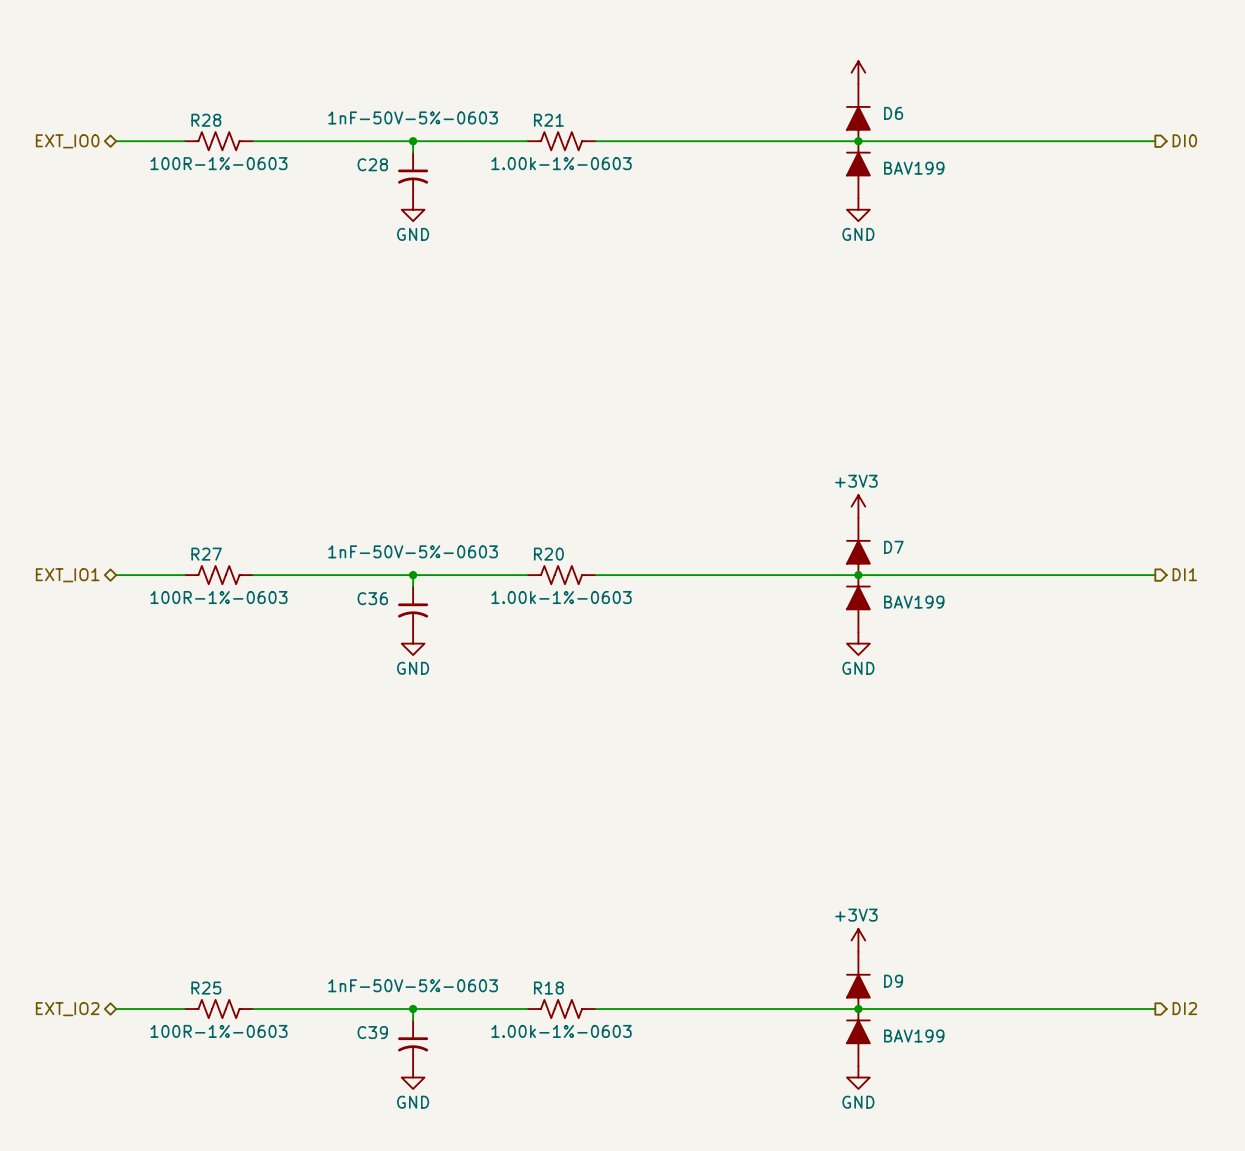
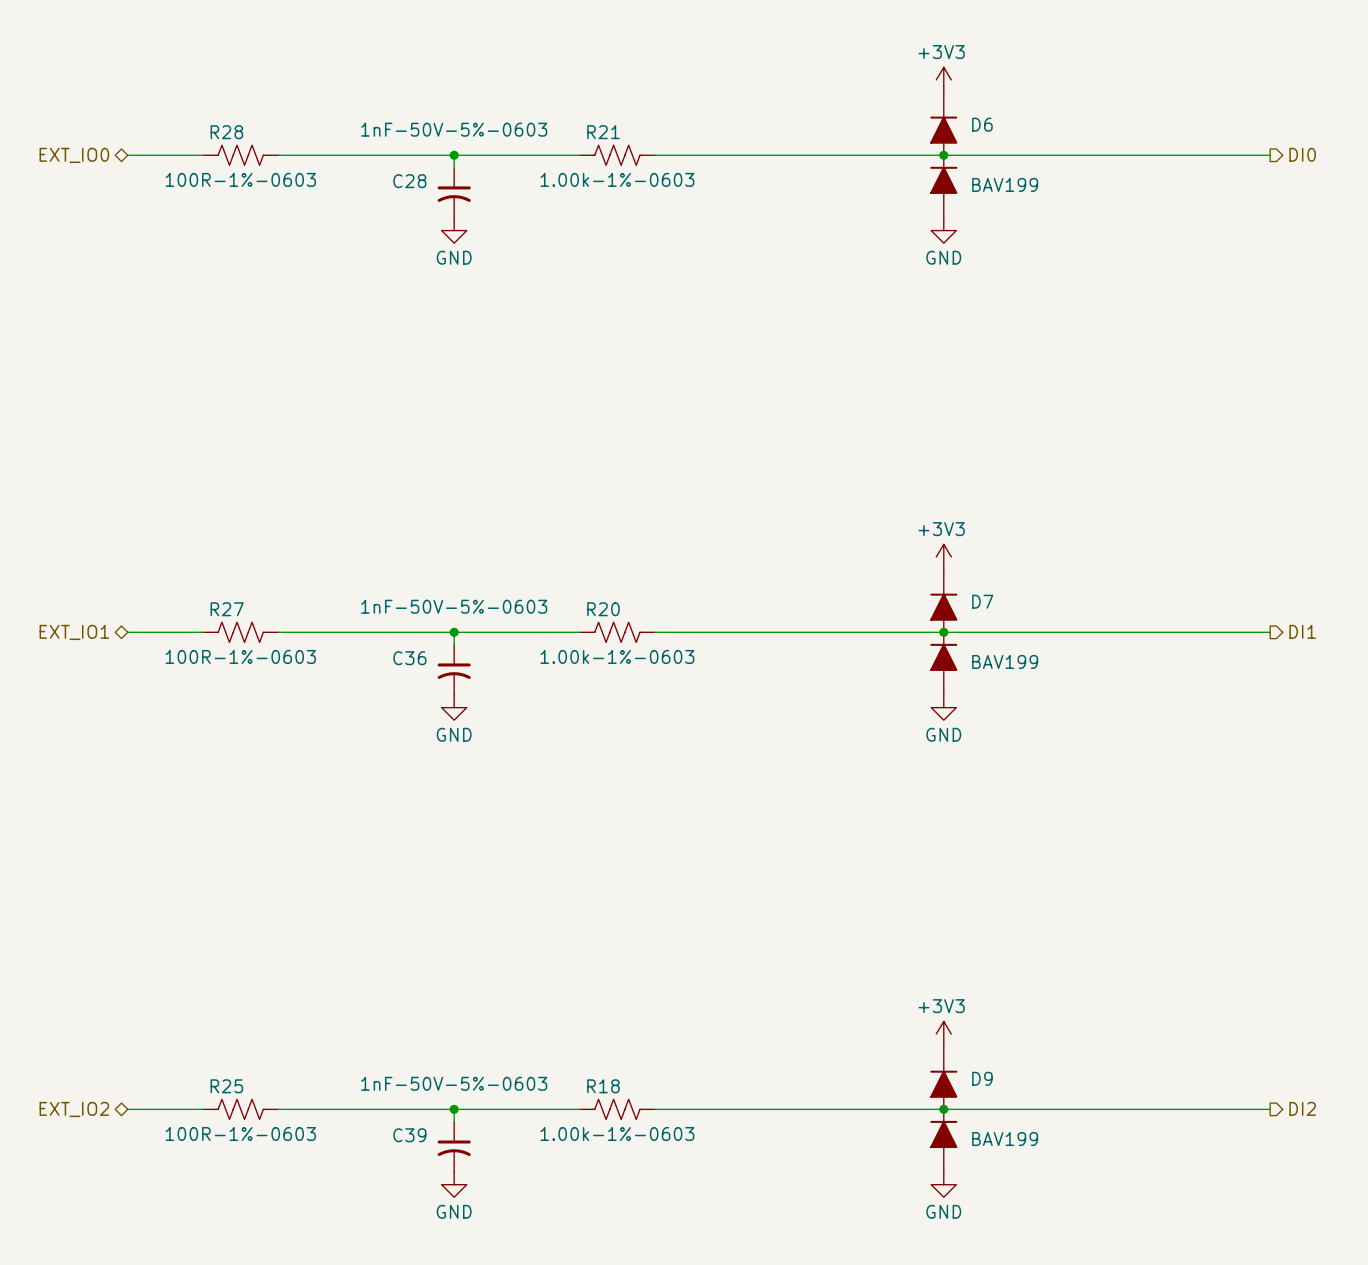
power symbol text: none -> +3V3 (941, 52)

